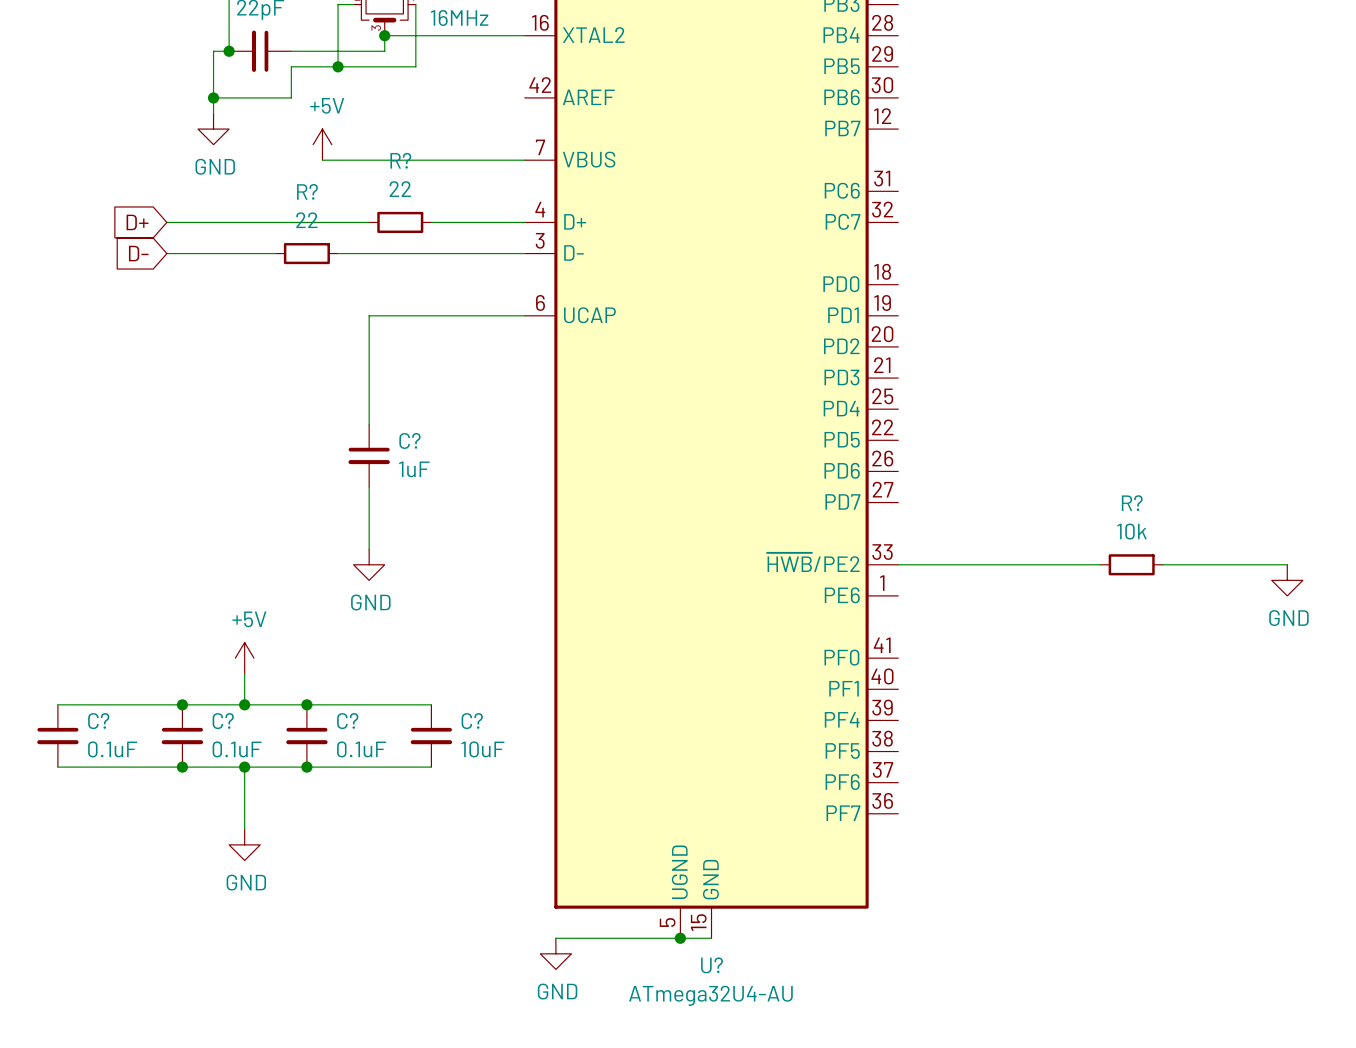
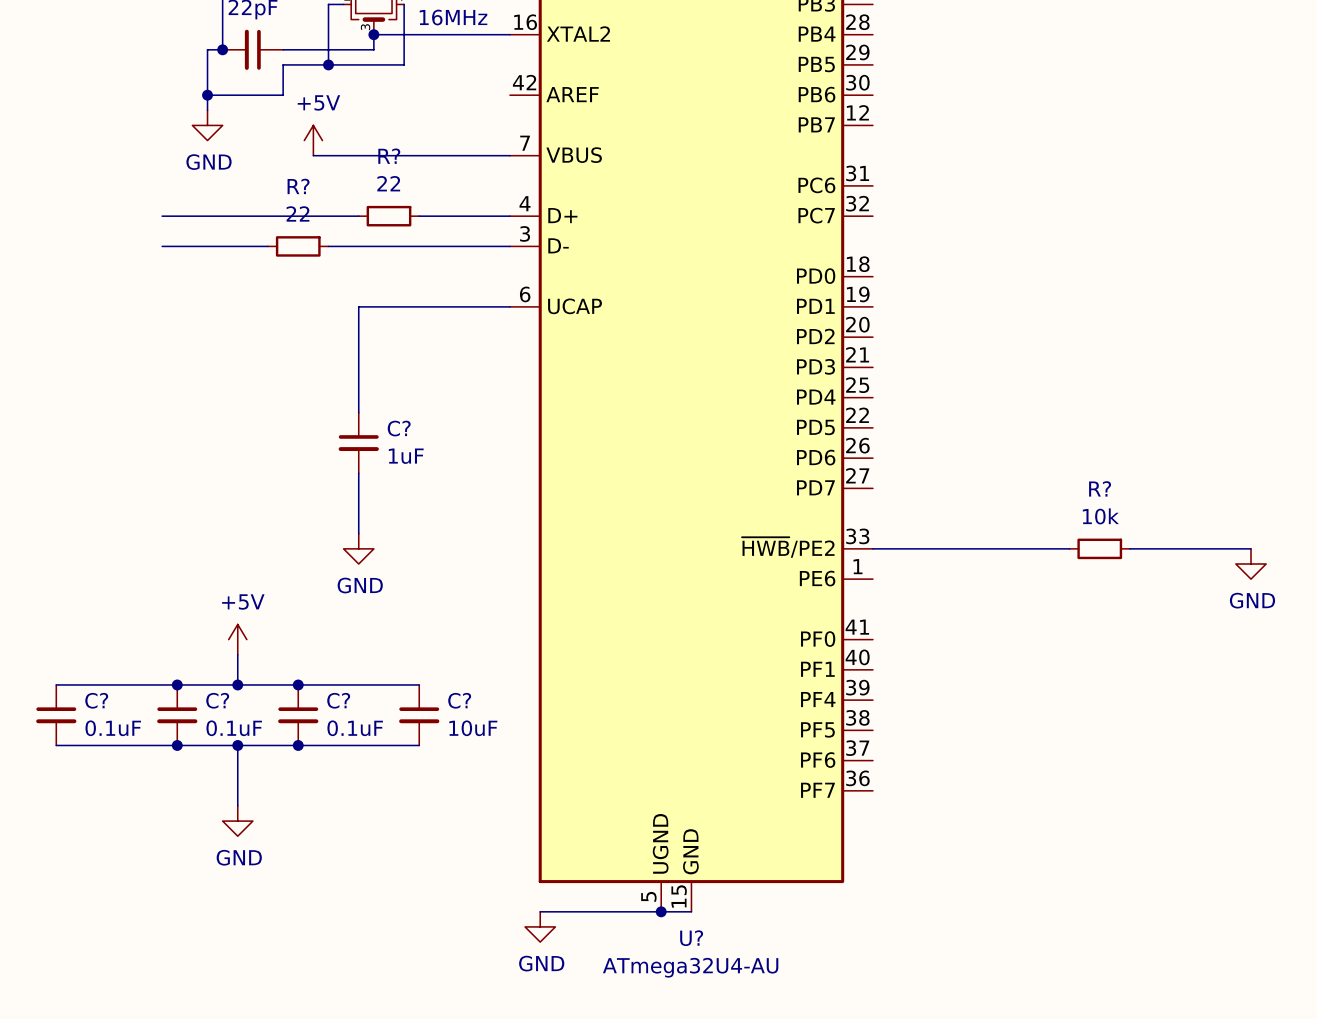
global label: D+ (137, 222) -> none
global label: D- (138, 253) -> none

